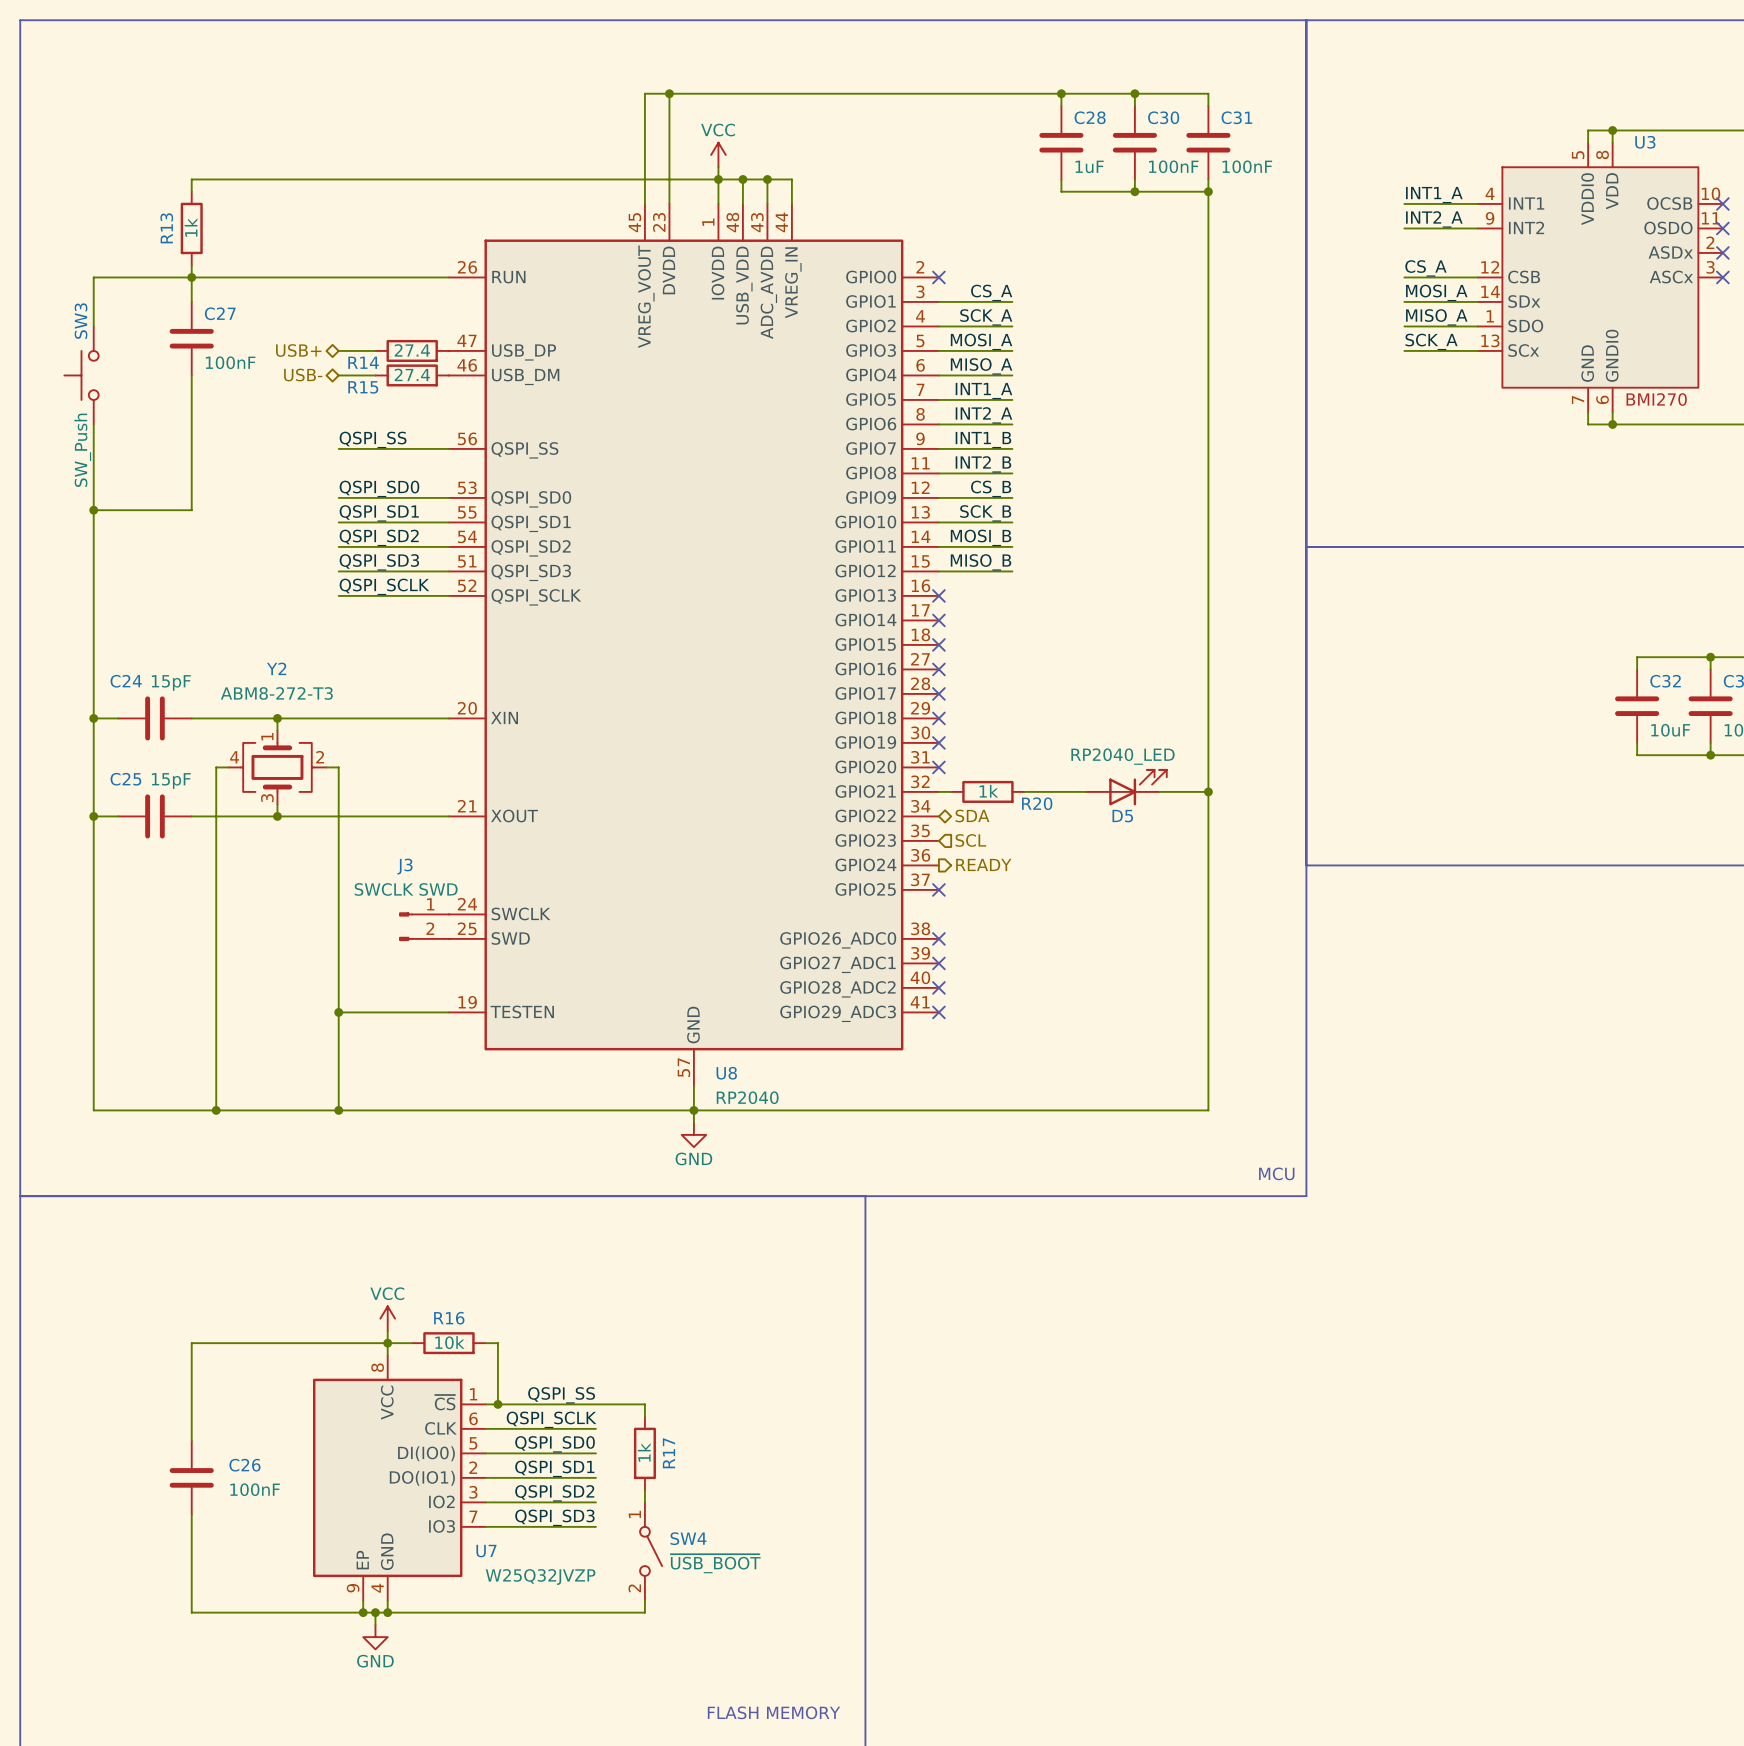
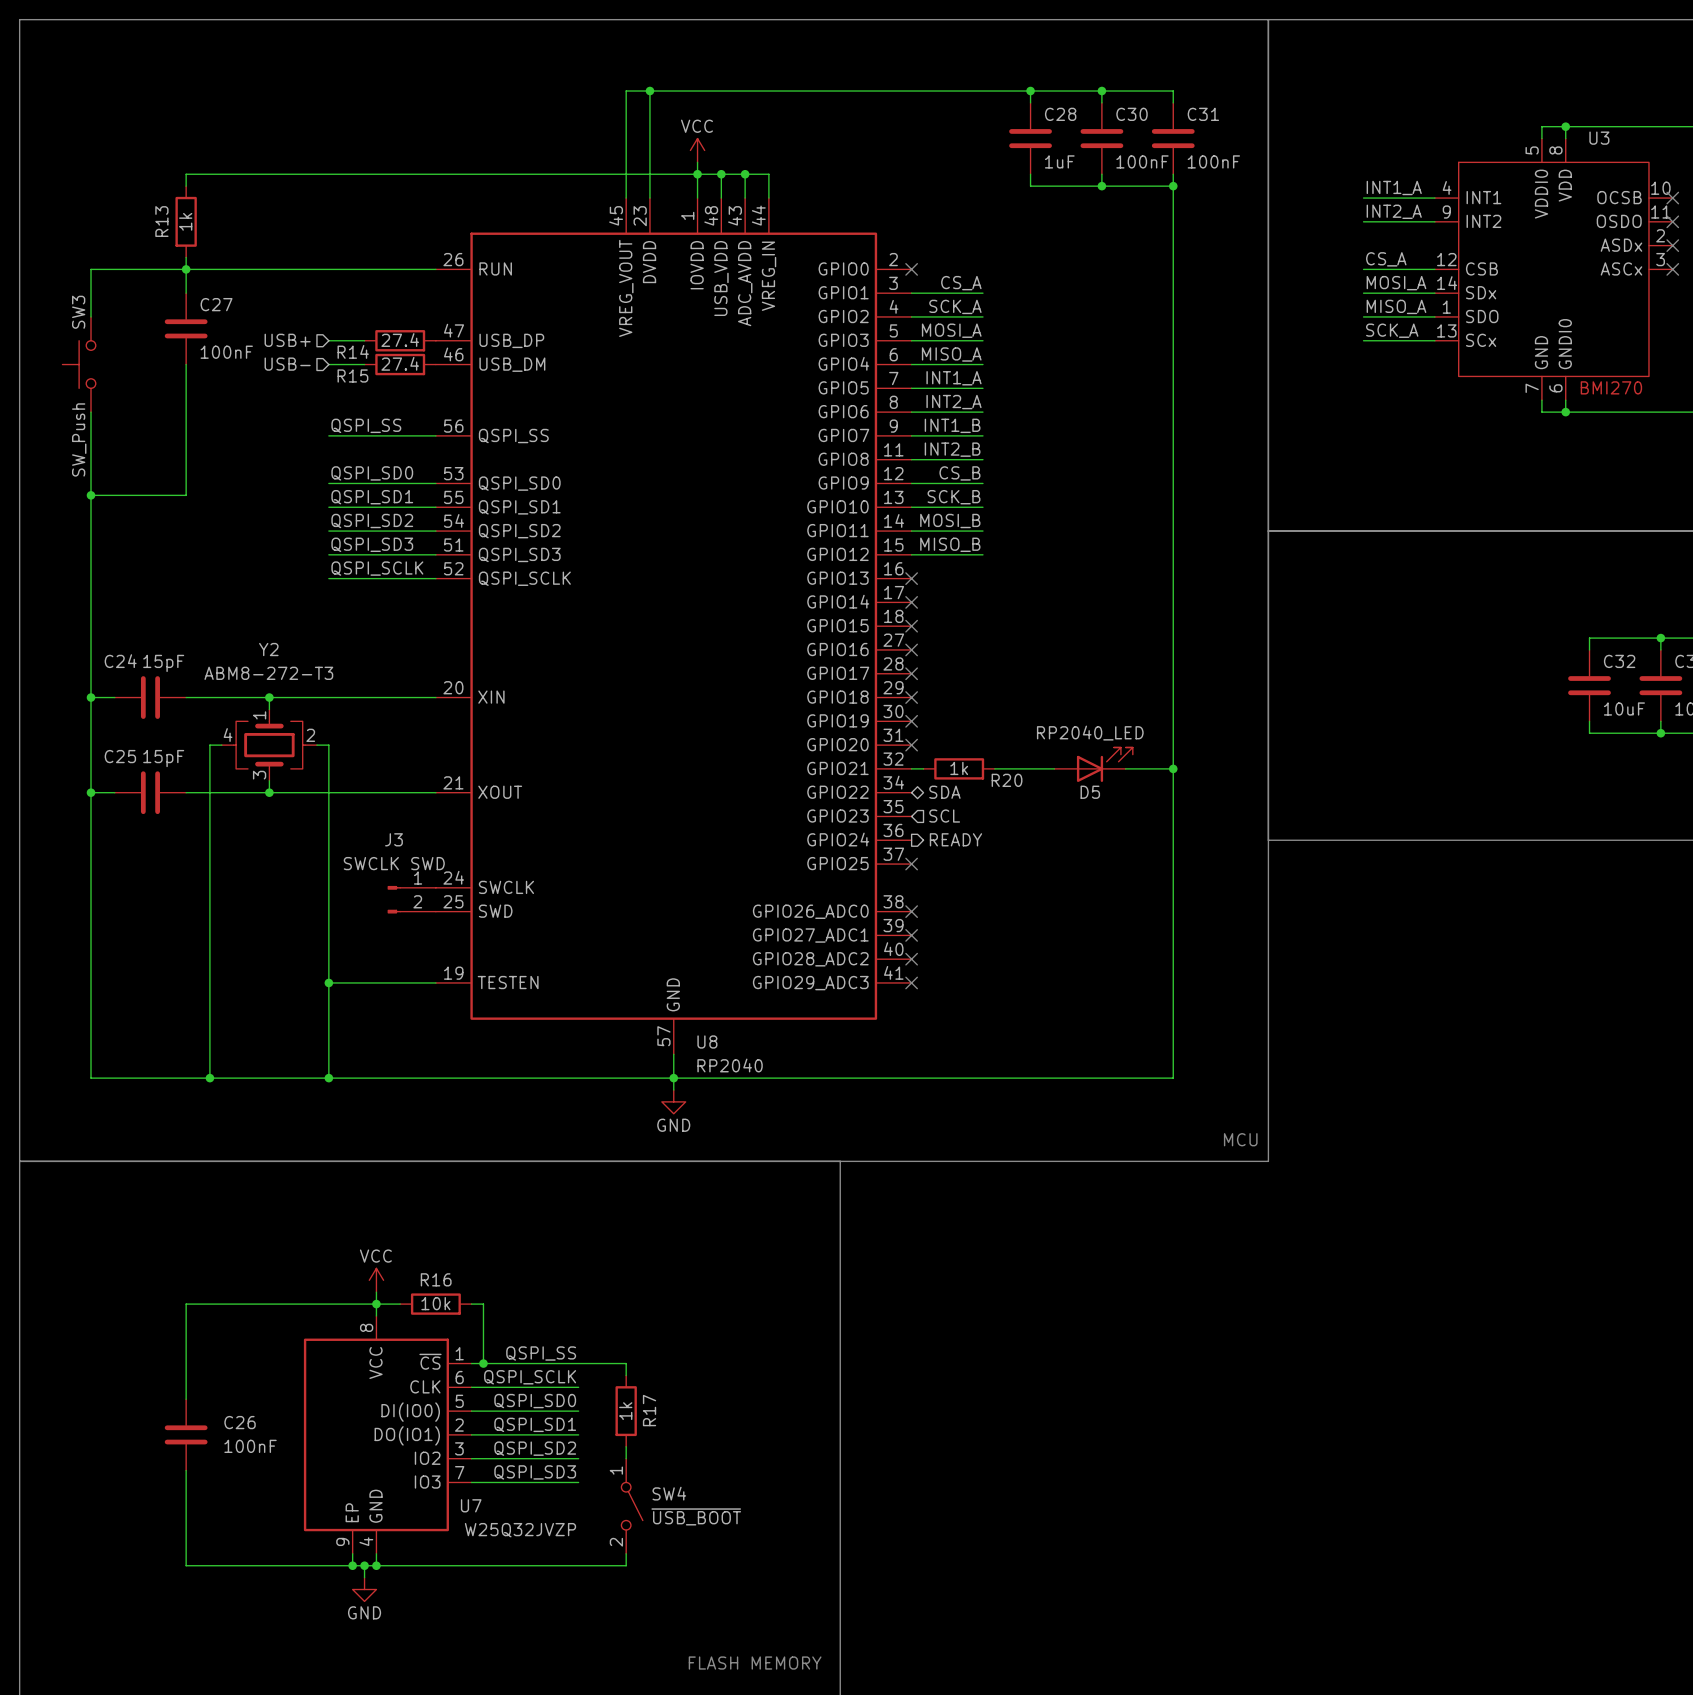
hierarchical label shape: bidirectional (298, 350) -> input (287, 340)
hierarchical label shape: bidirectional (303, 375) -> input (287, 364)

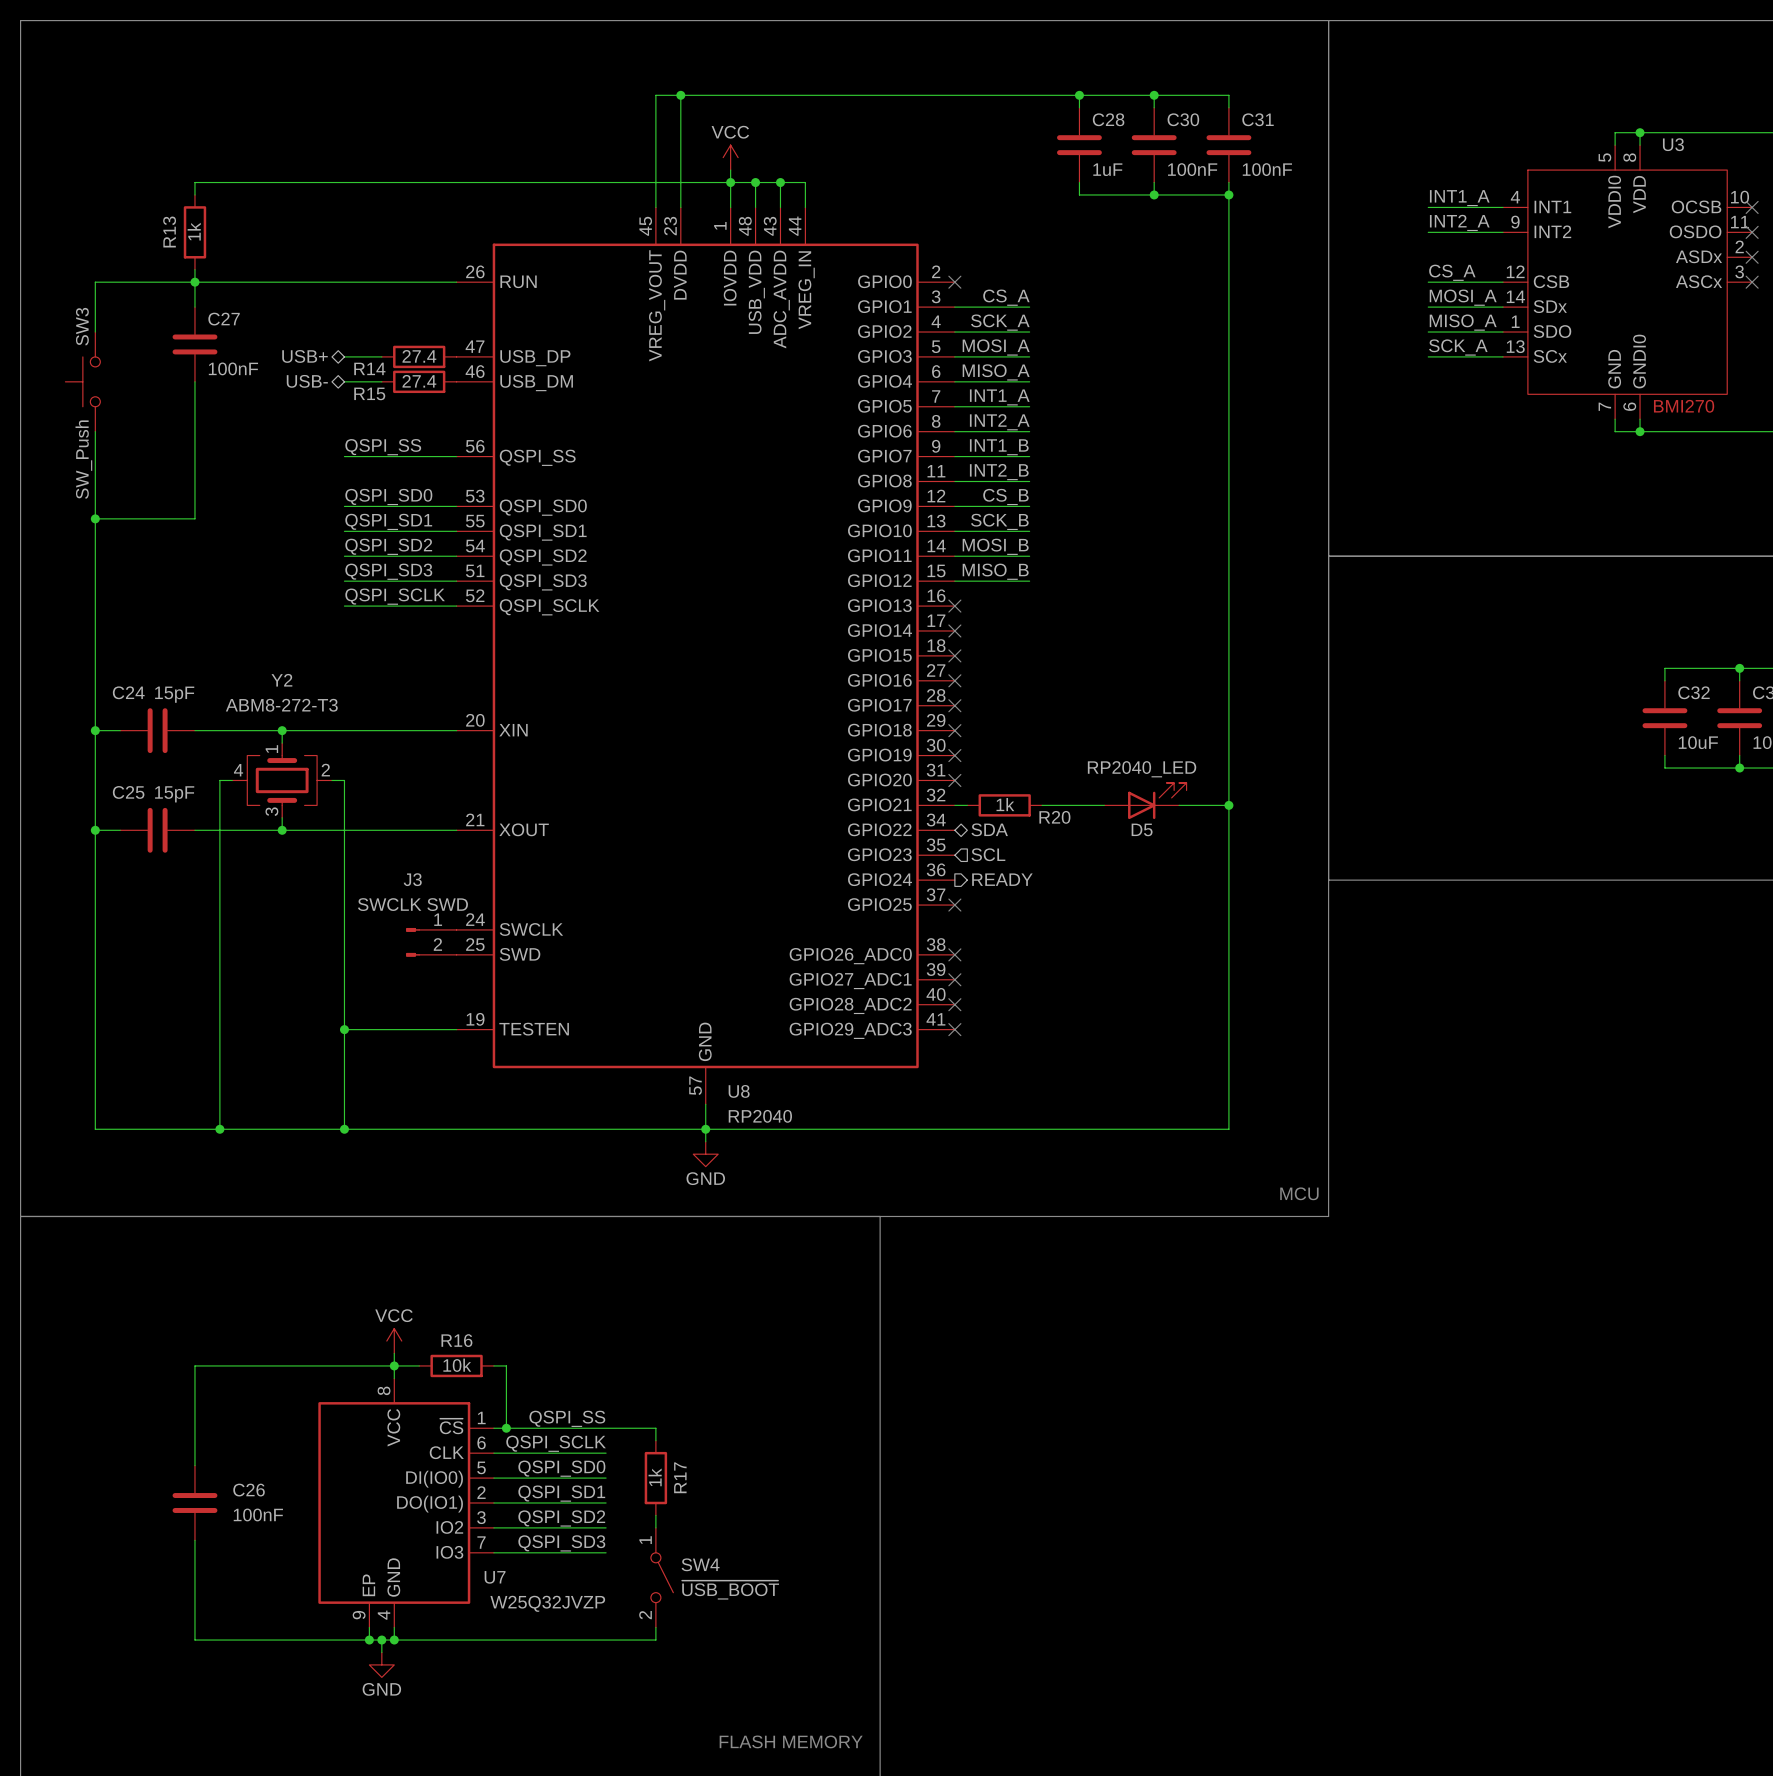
hierarchical label shape: input (287, 340) -> bidirectional (304, 356)
hierarchical label shape: input (287, 364) -> bidirectional (307, 381)

